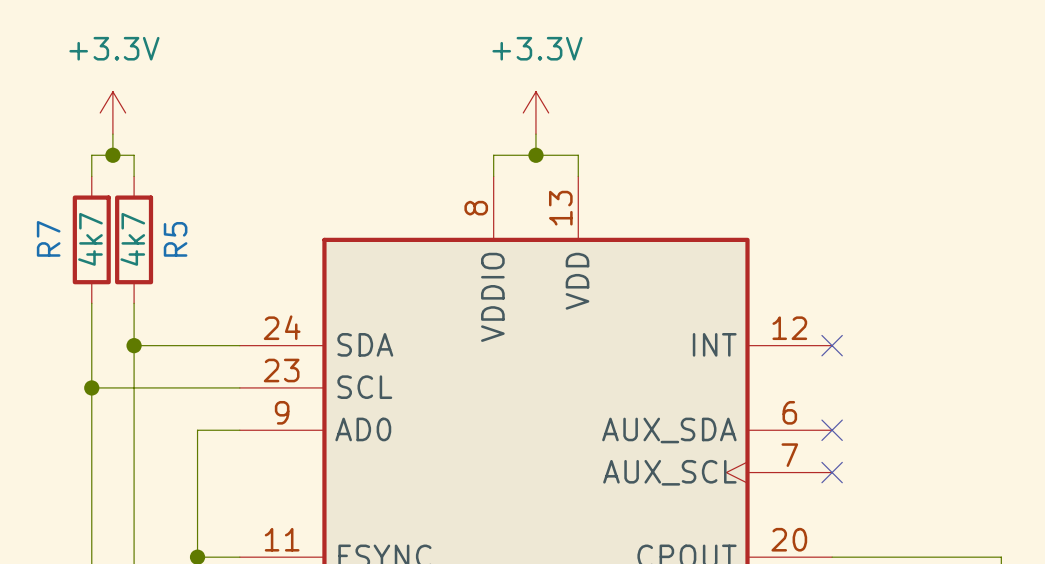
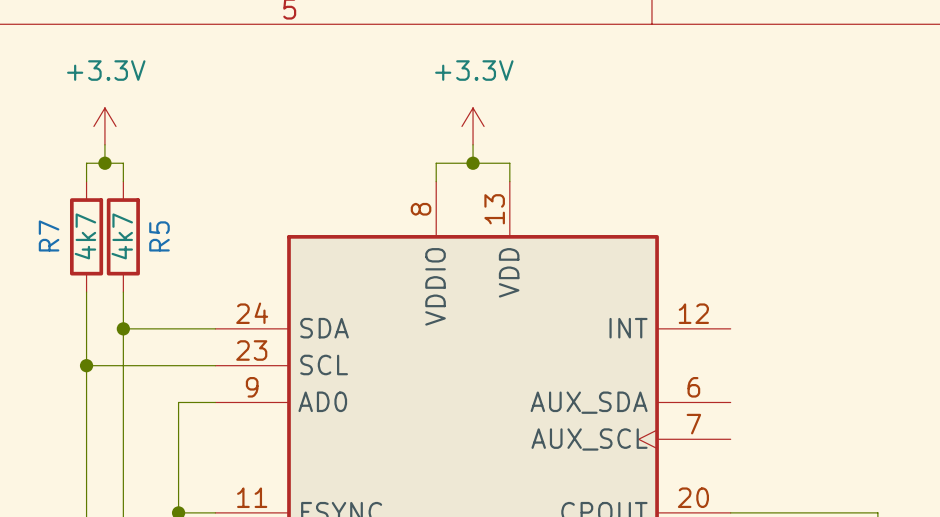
no-connect mark: (832, 345) -> none
no-connect mark: (832, 430) -> none
no-connect mark: (832, 472) -> none

